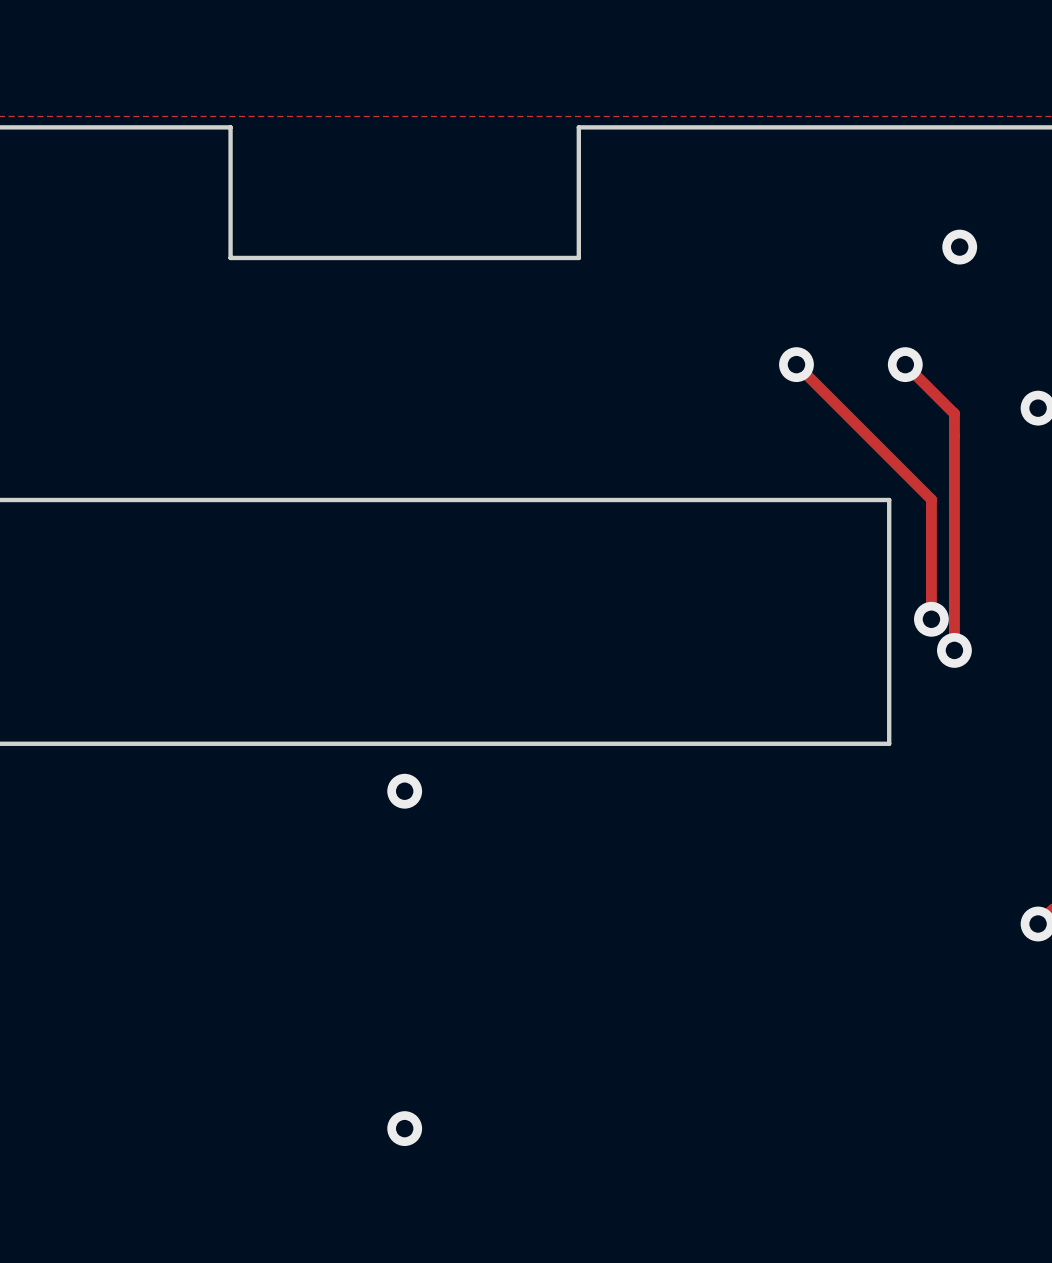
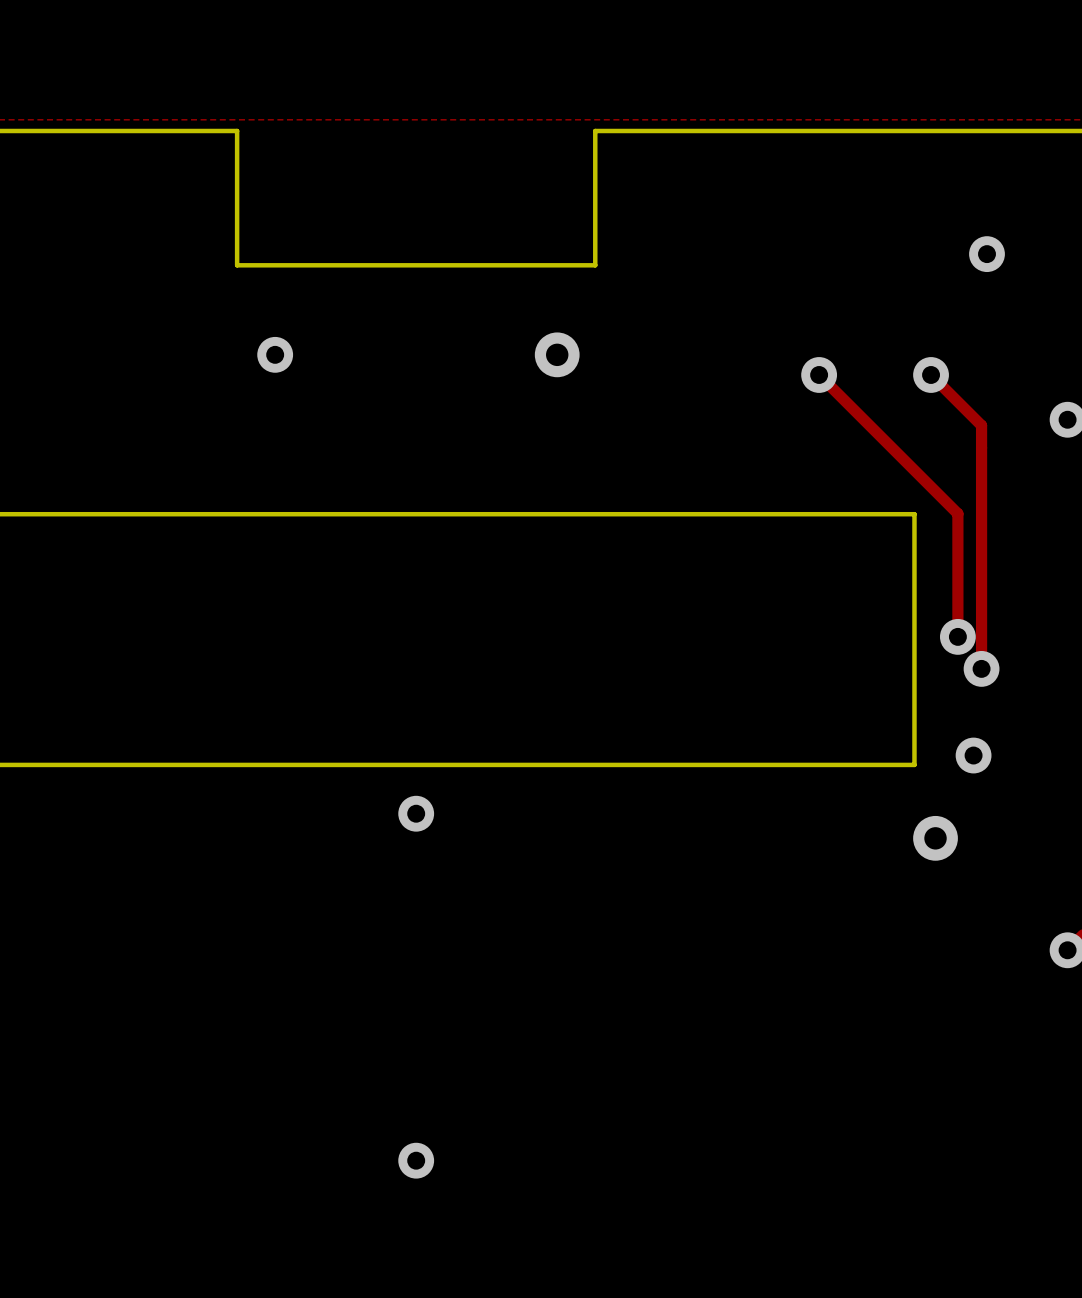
via: none -> (275, 354)
via: none -> (557, 354)
via: none -> (973, 755)
via: none -> (935, 838)

